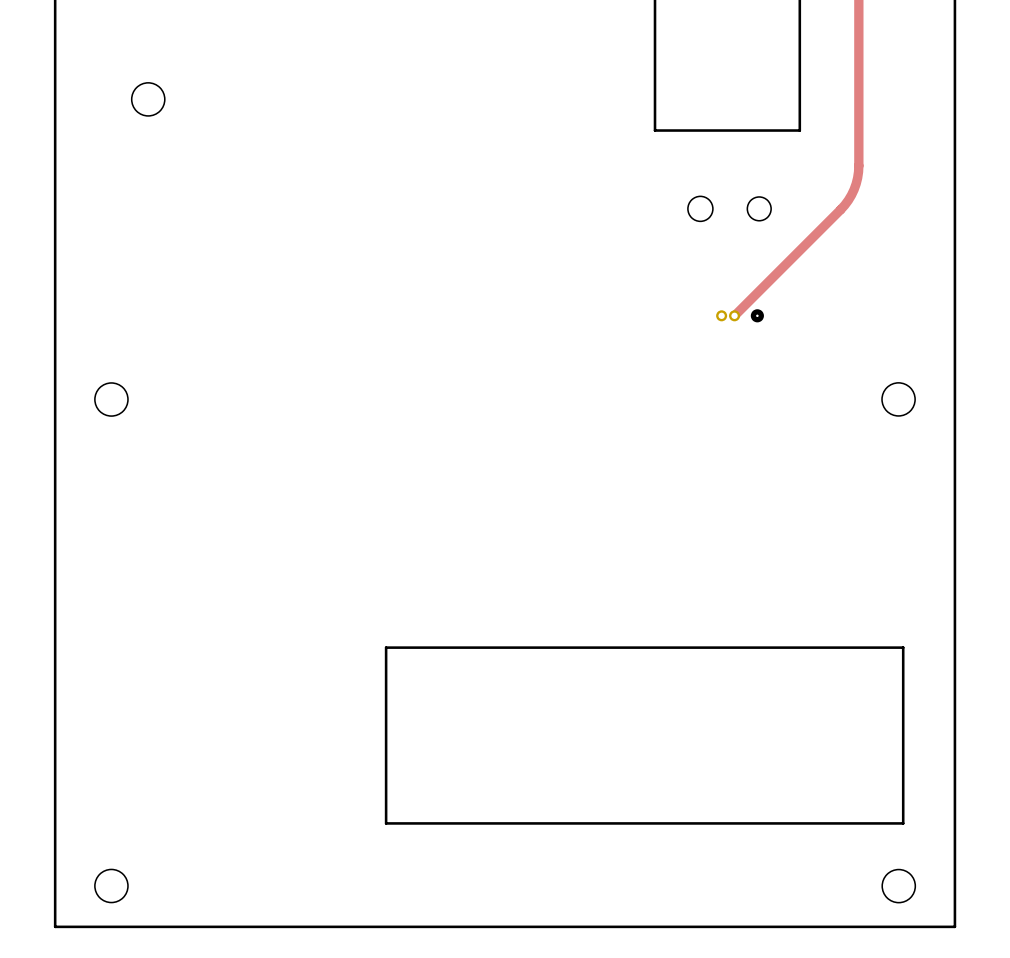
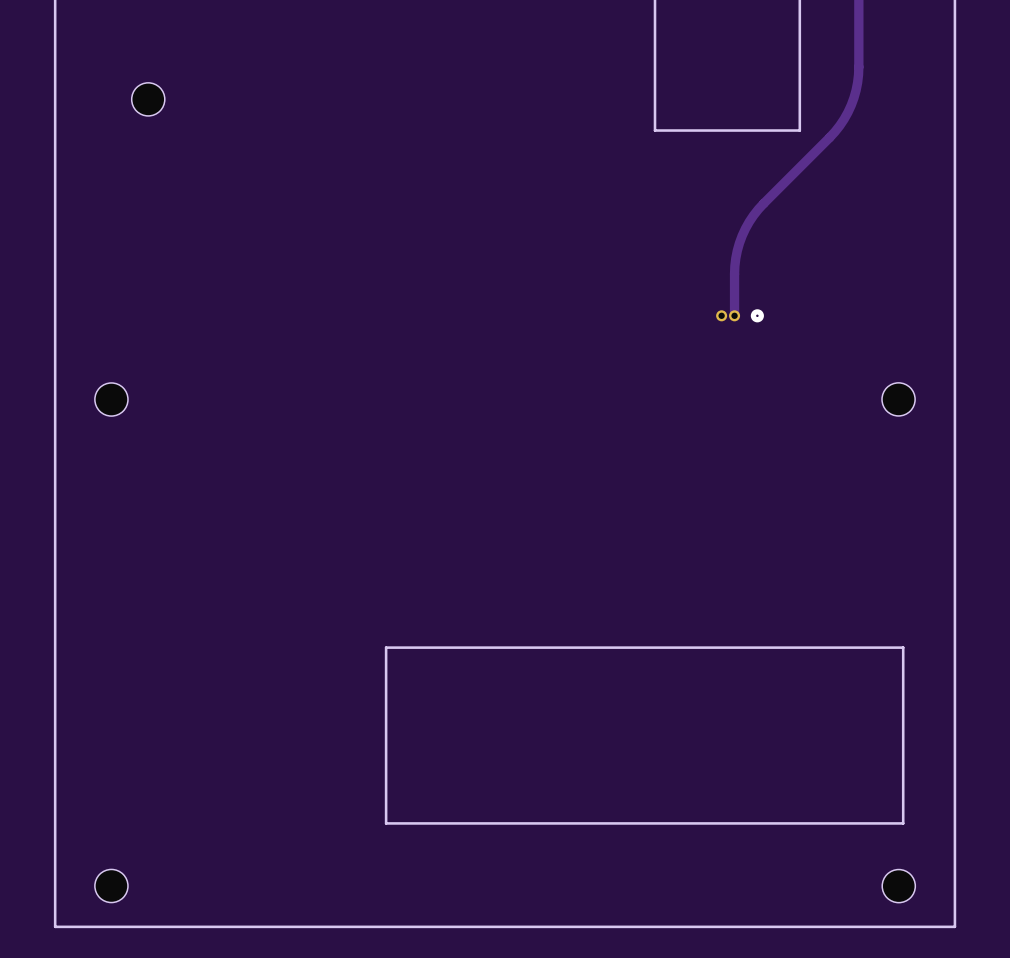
track: (858, 67) (858, 171) (851, 195) (840, 209) (734, 315) -> (858, 67) (853, 97) (839, 125) (758, 209) (745, 228) (735, 258) (734, 315)
round board edge: [687, 196, 714, 222] -> none
round board edge: [747, 196, 772, 222] -> none

